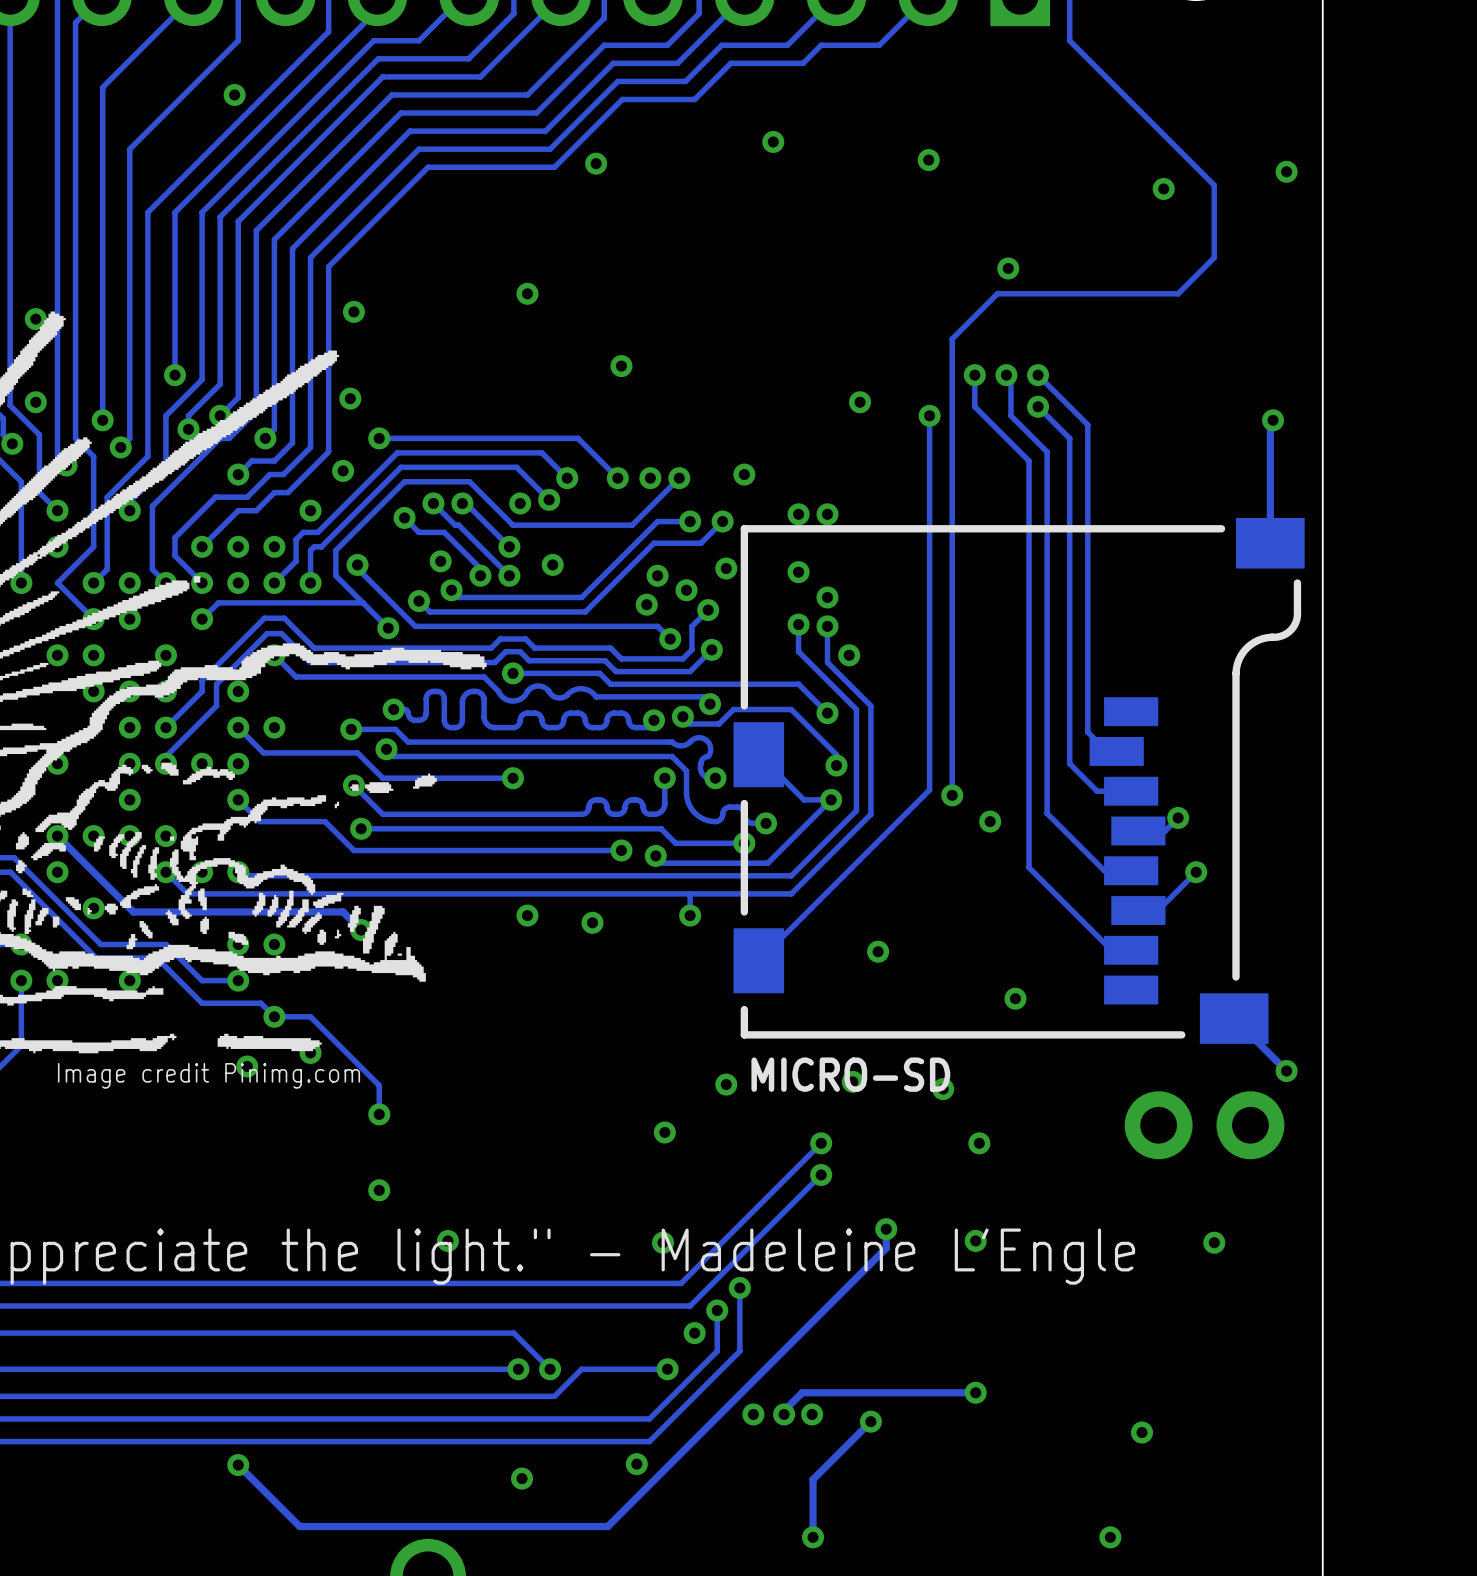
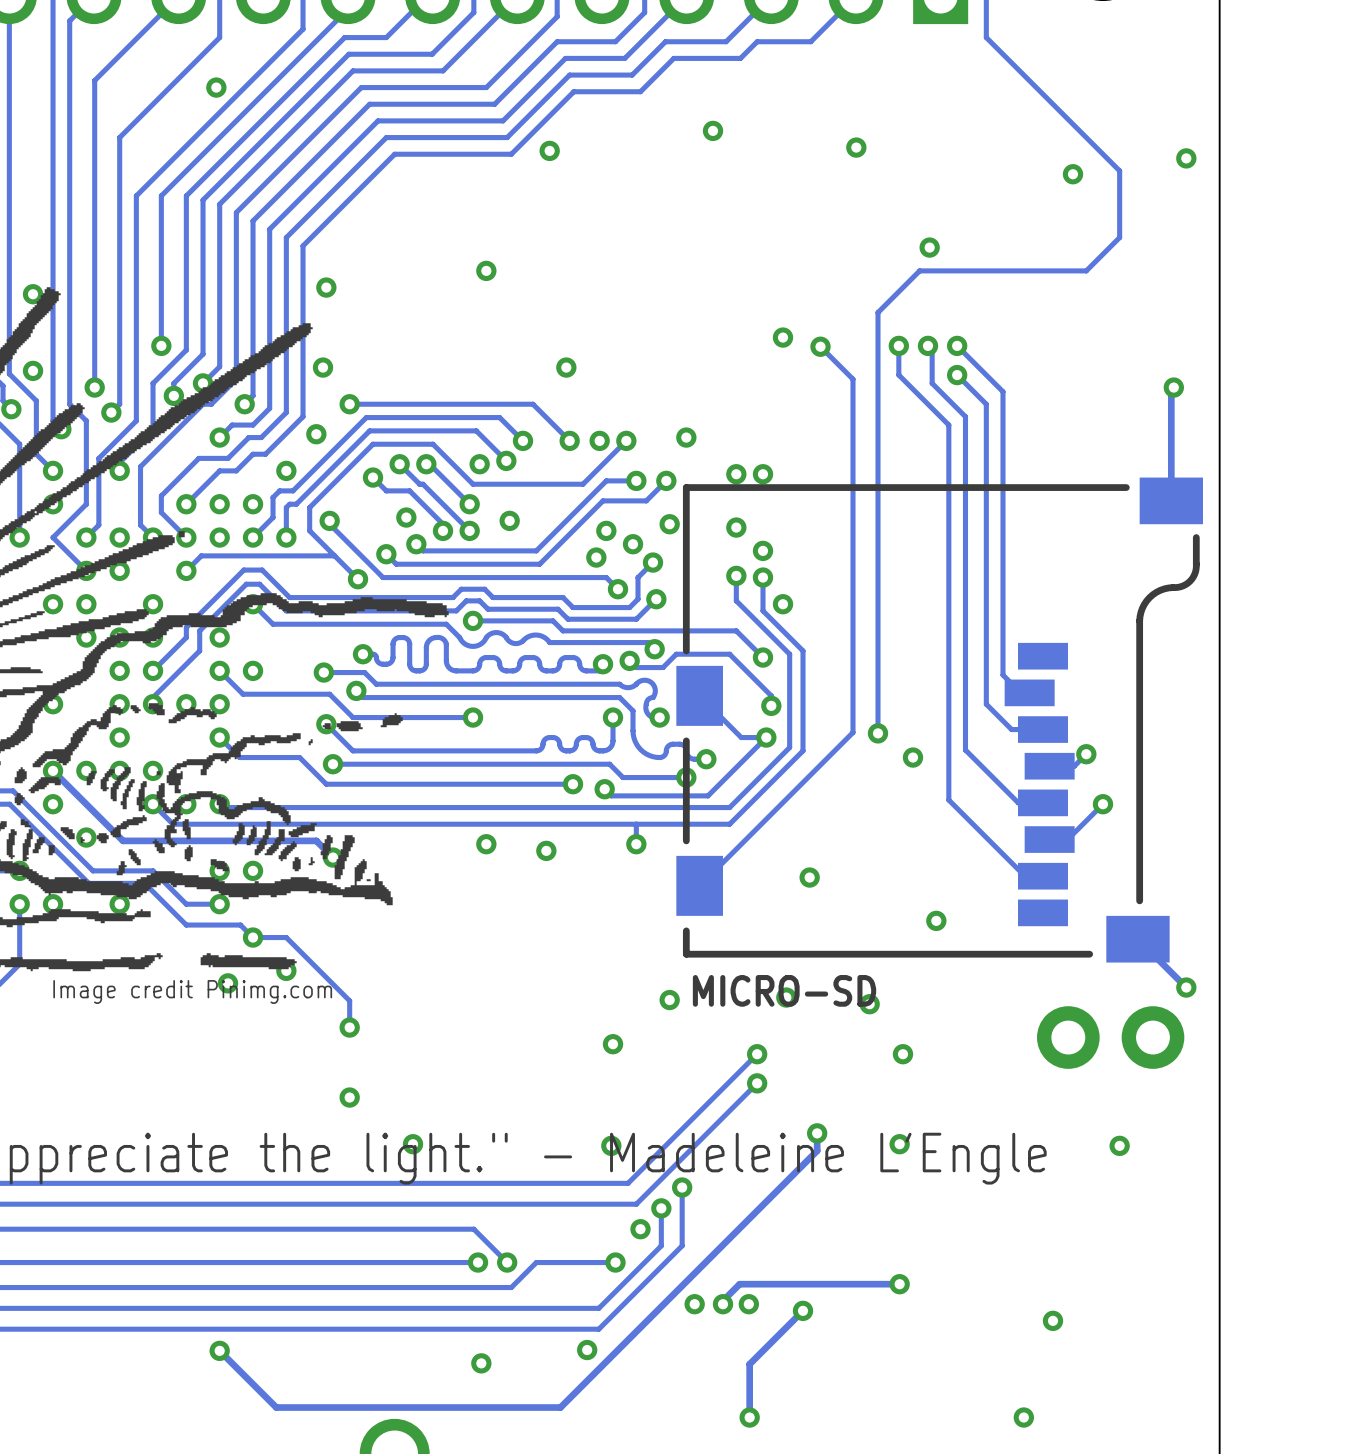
via position: (621, 366) -> (566, 367)
via: none -> (783, 337)
via: none -> (820, 346)
via: (860, 402) -> none
track: (929, 415) (929, 789) (925, 794) -> (820, 346) (853, 379) (853, 732)
via: (929, 415) -> none

